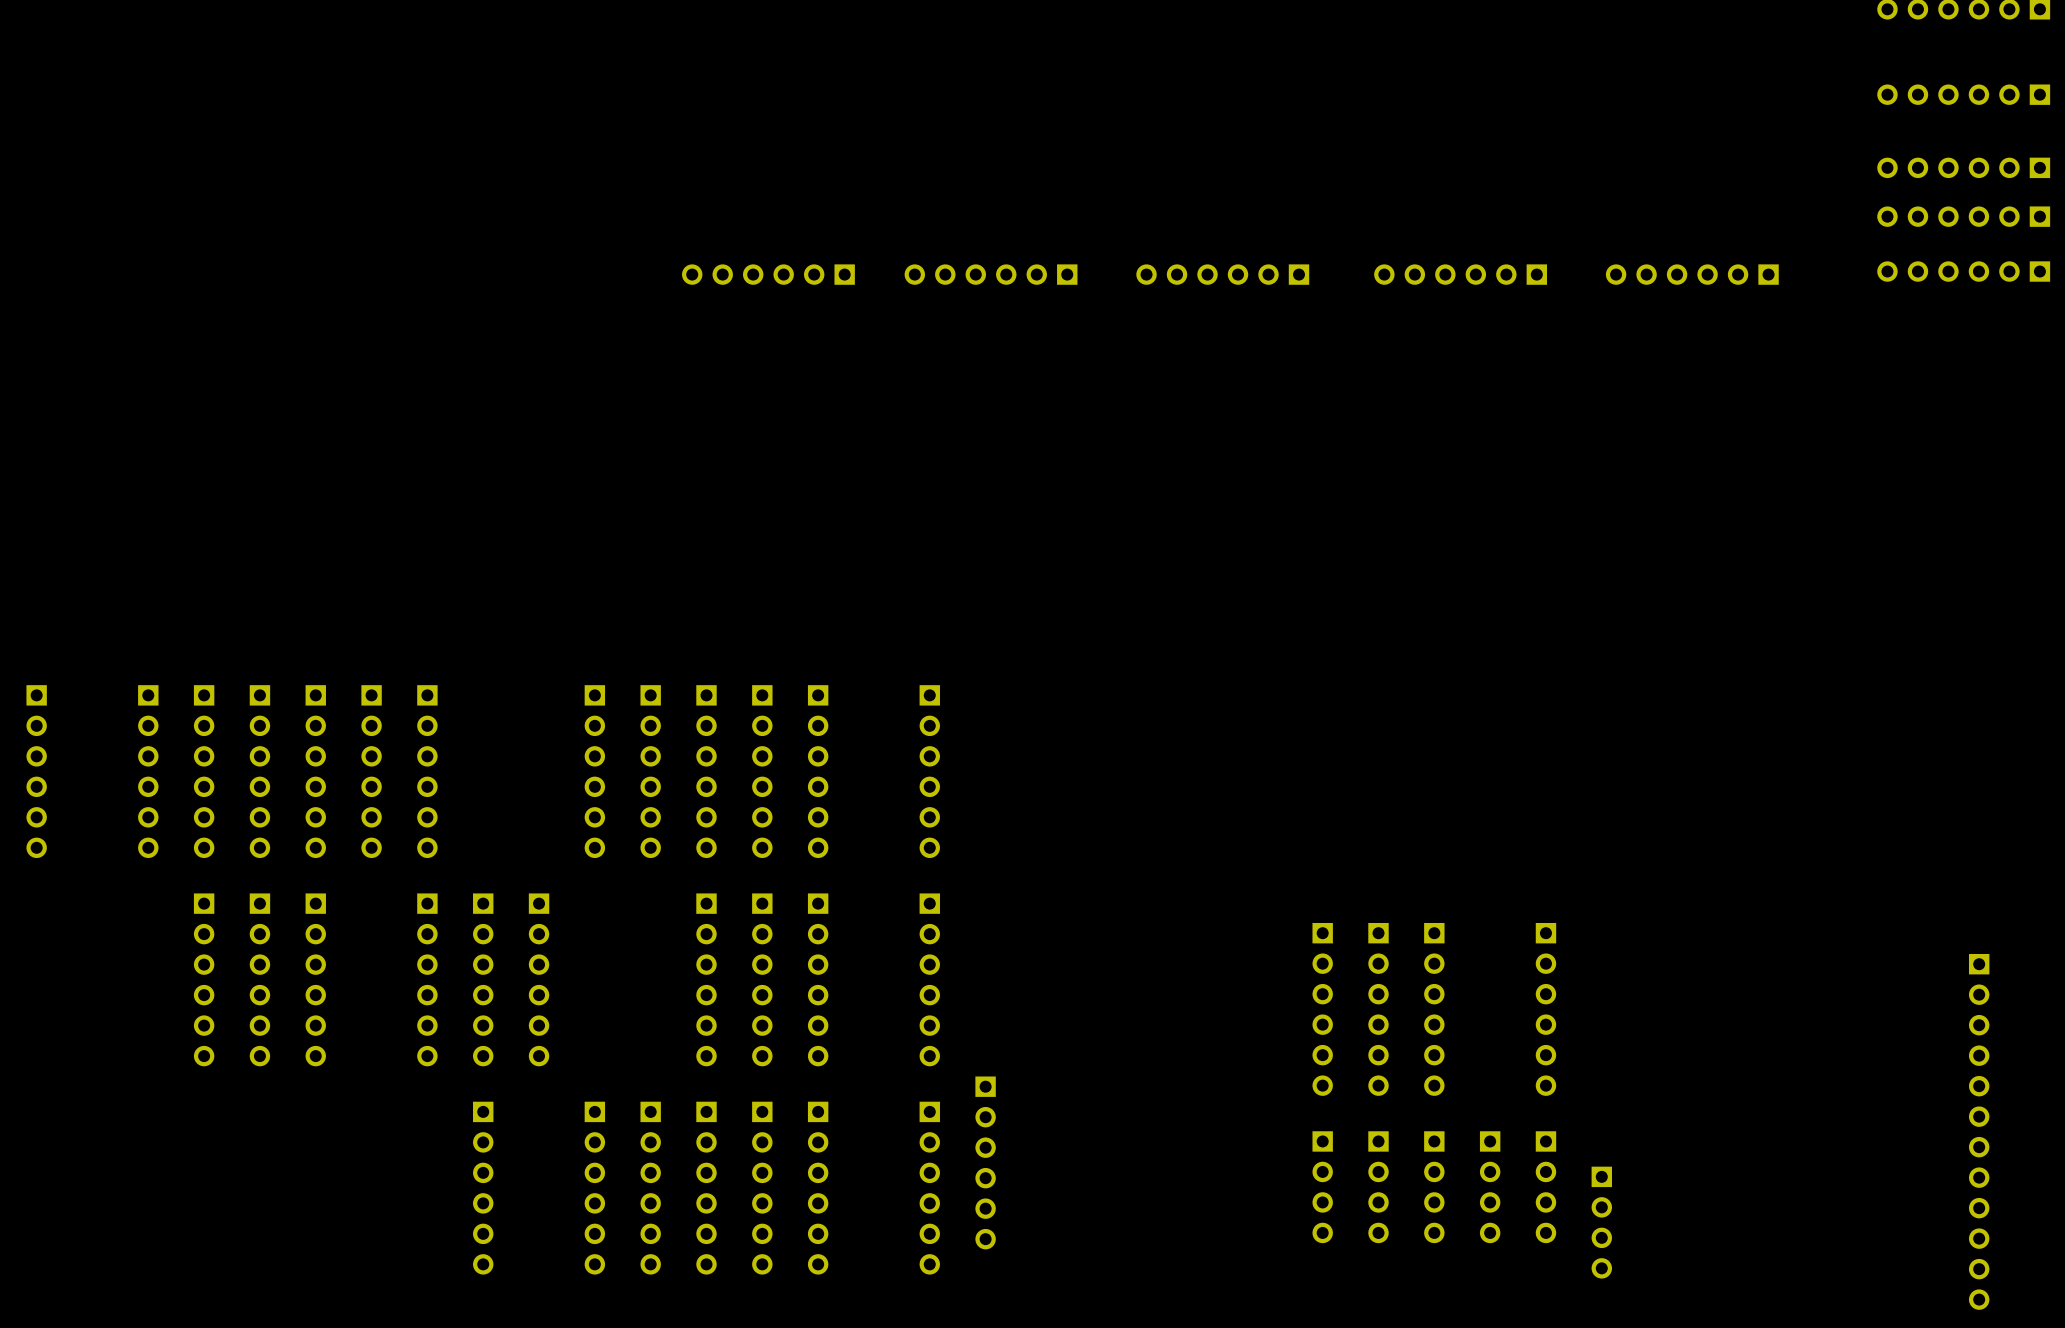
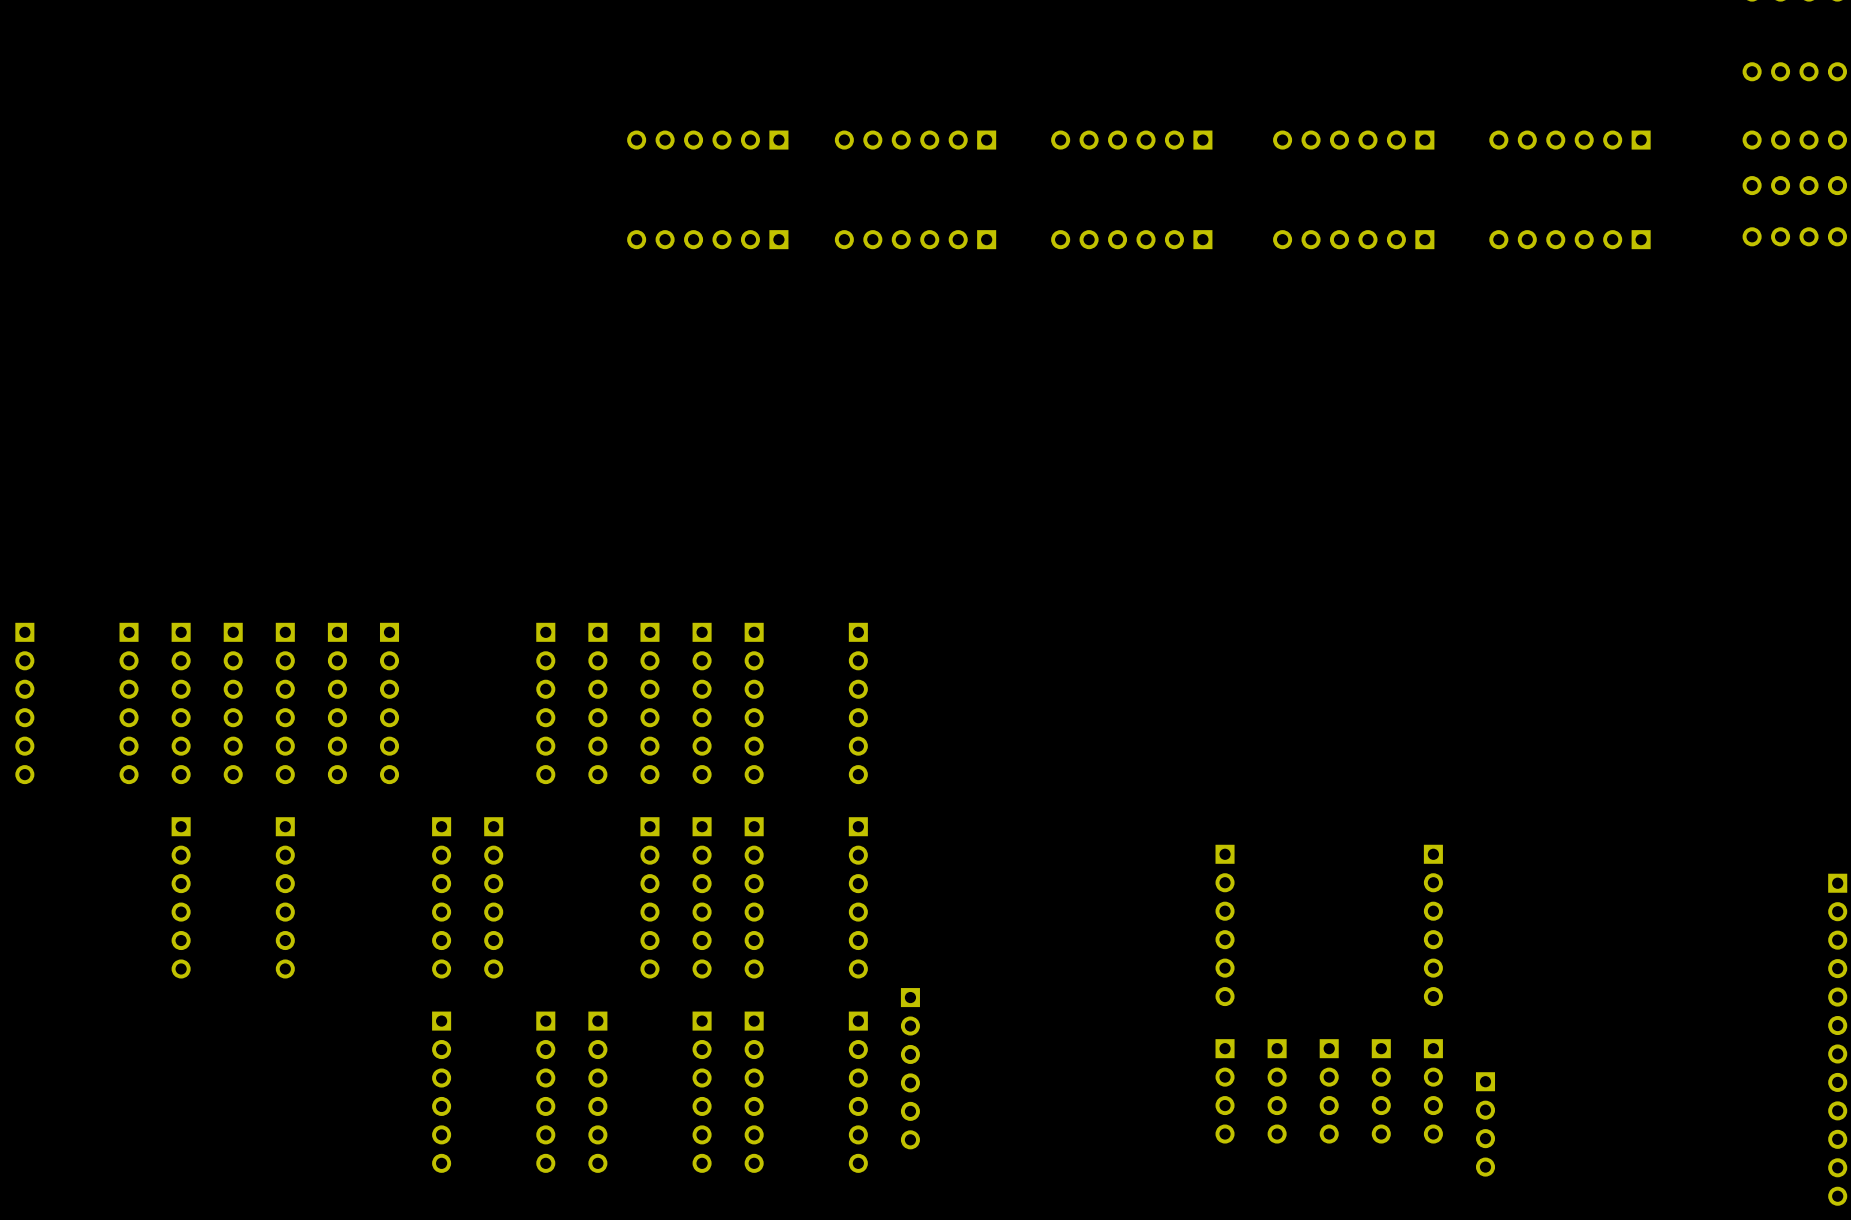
part: none -> (707, 140)
part: none -> (915, 140)
part: none -> (1131, 140)
part: none -> (1353, 140)
part: none -> (1569, 140)
part: (259, 979) -> none
part: (427, 979) -> none
part: (1378, 1009) -> none
part: (1434, 1009) -> none
part: (706, 1188) -> none

